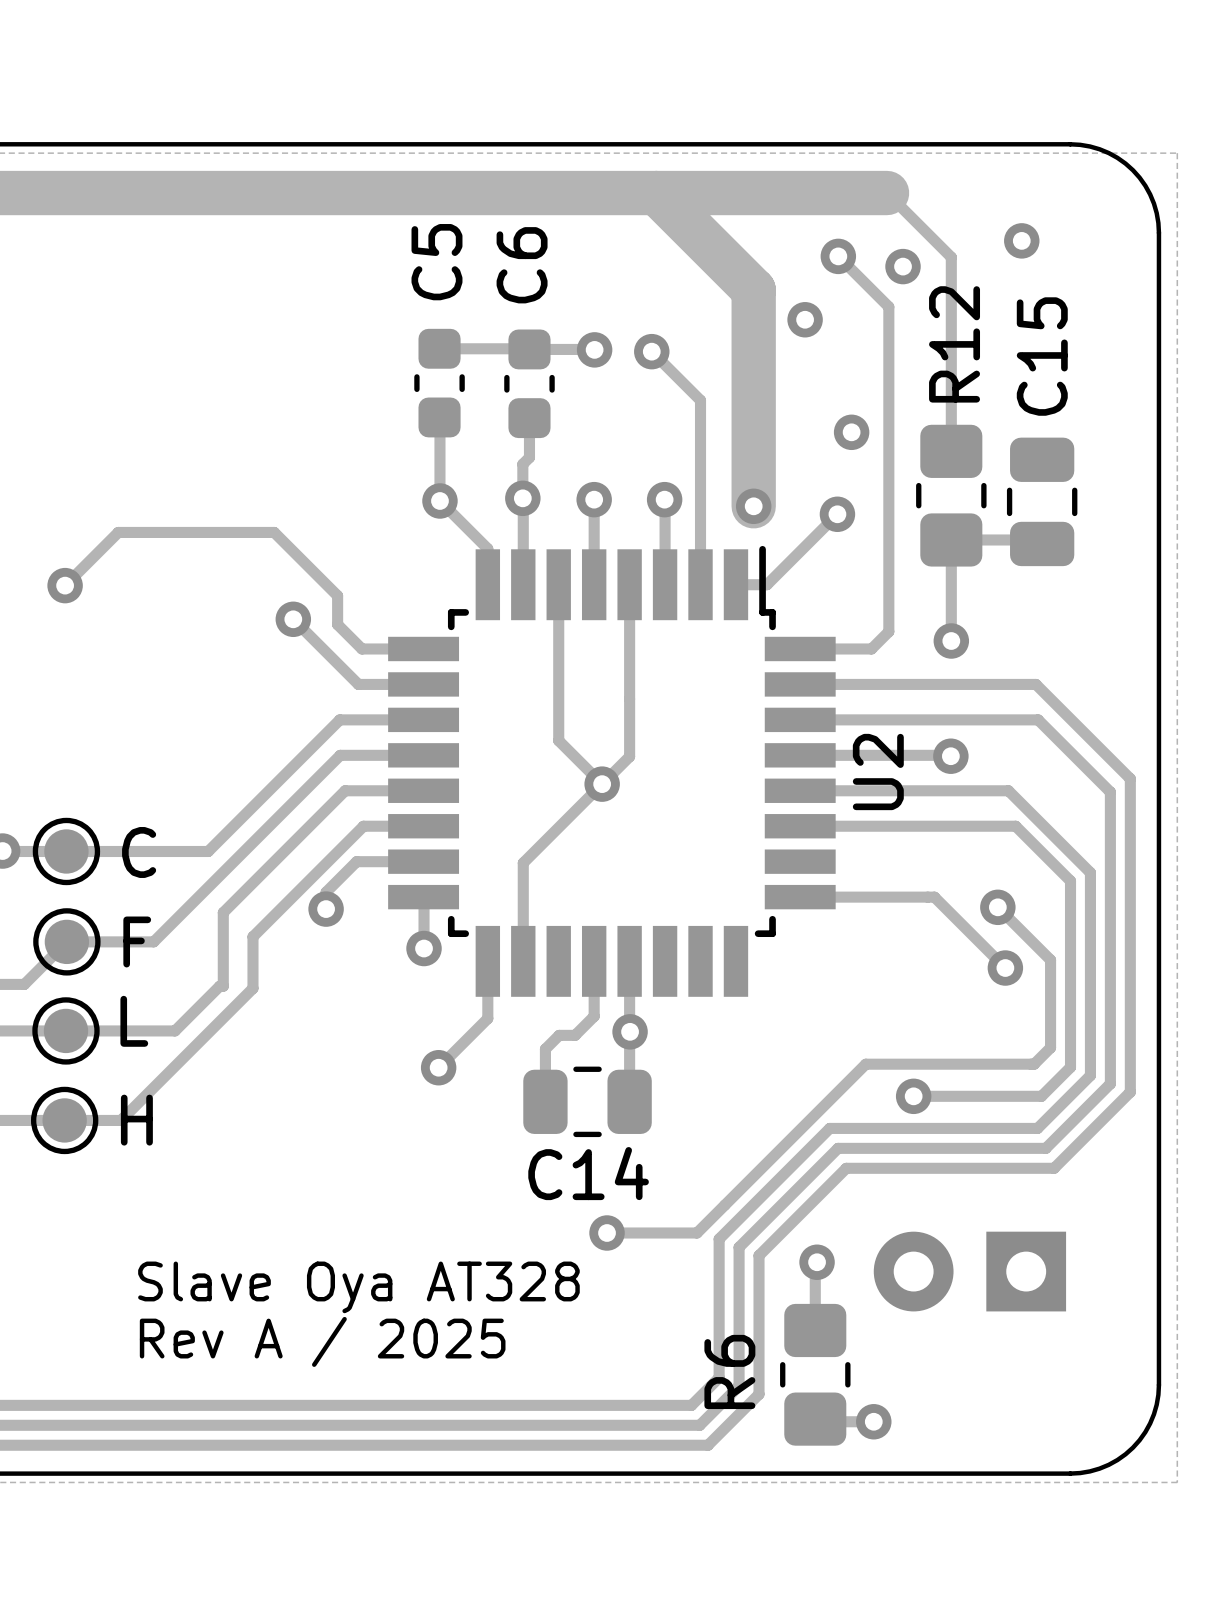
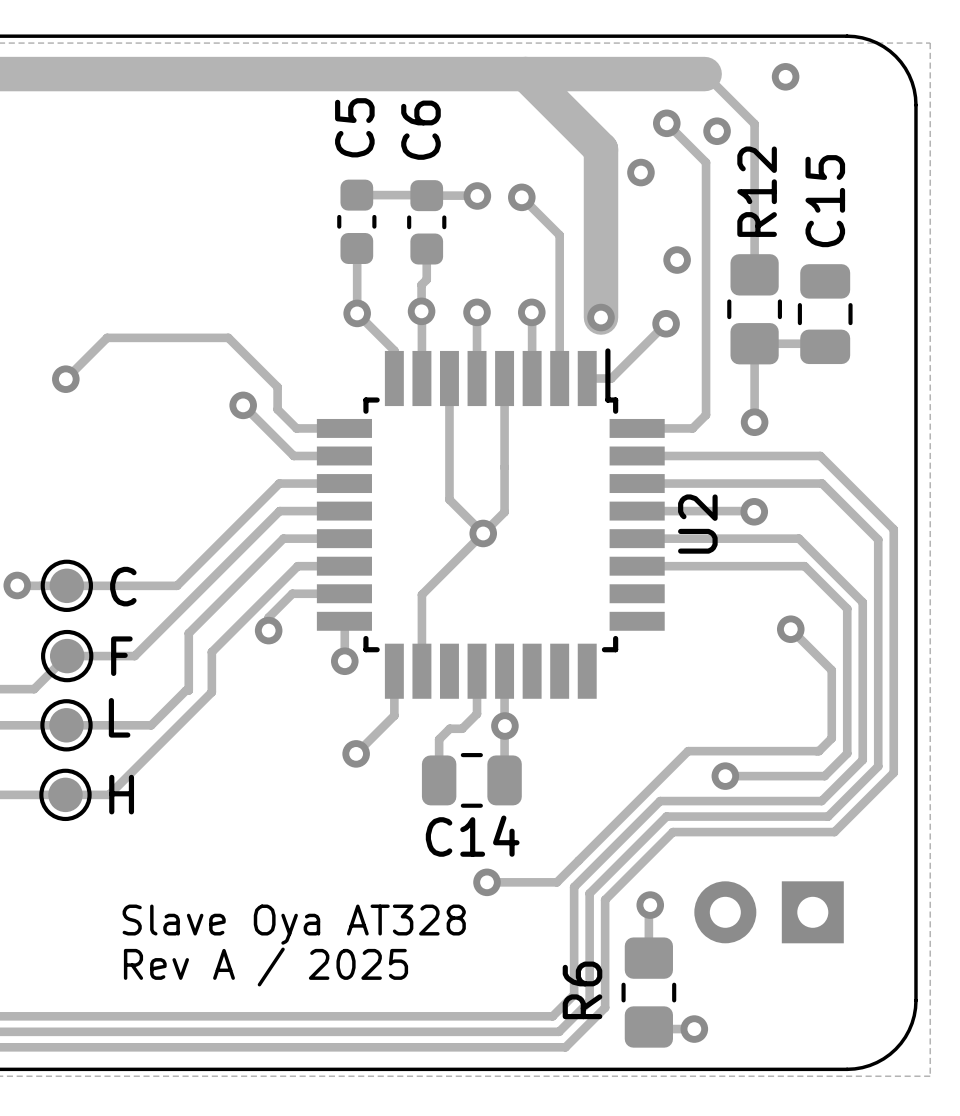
via position: (1021, 240) -> (785, 76)
track: (800, 897) (934, 897) (1005, 968) -> none
via: (1005, 968) -> none

